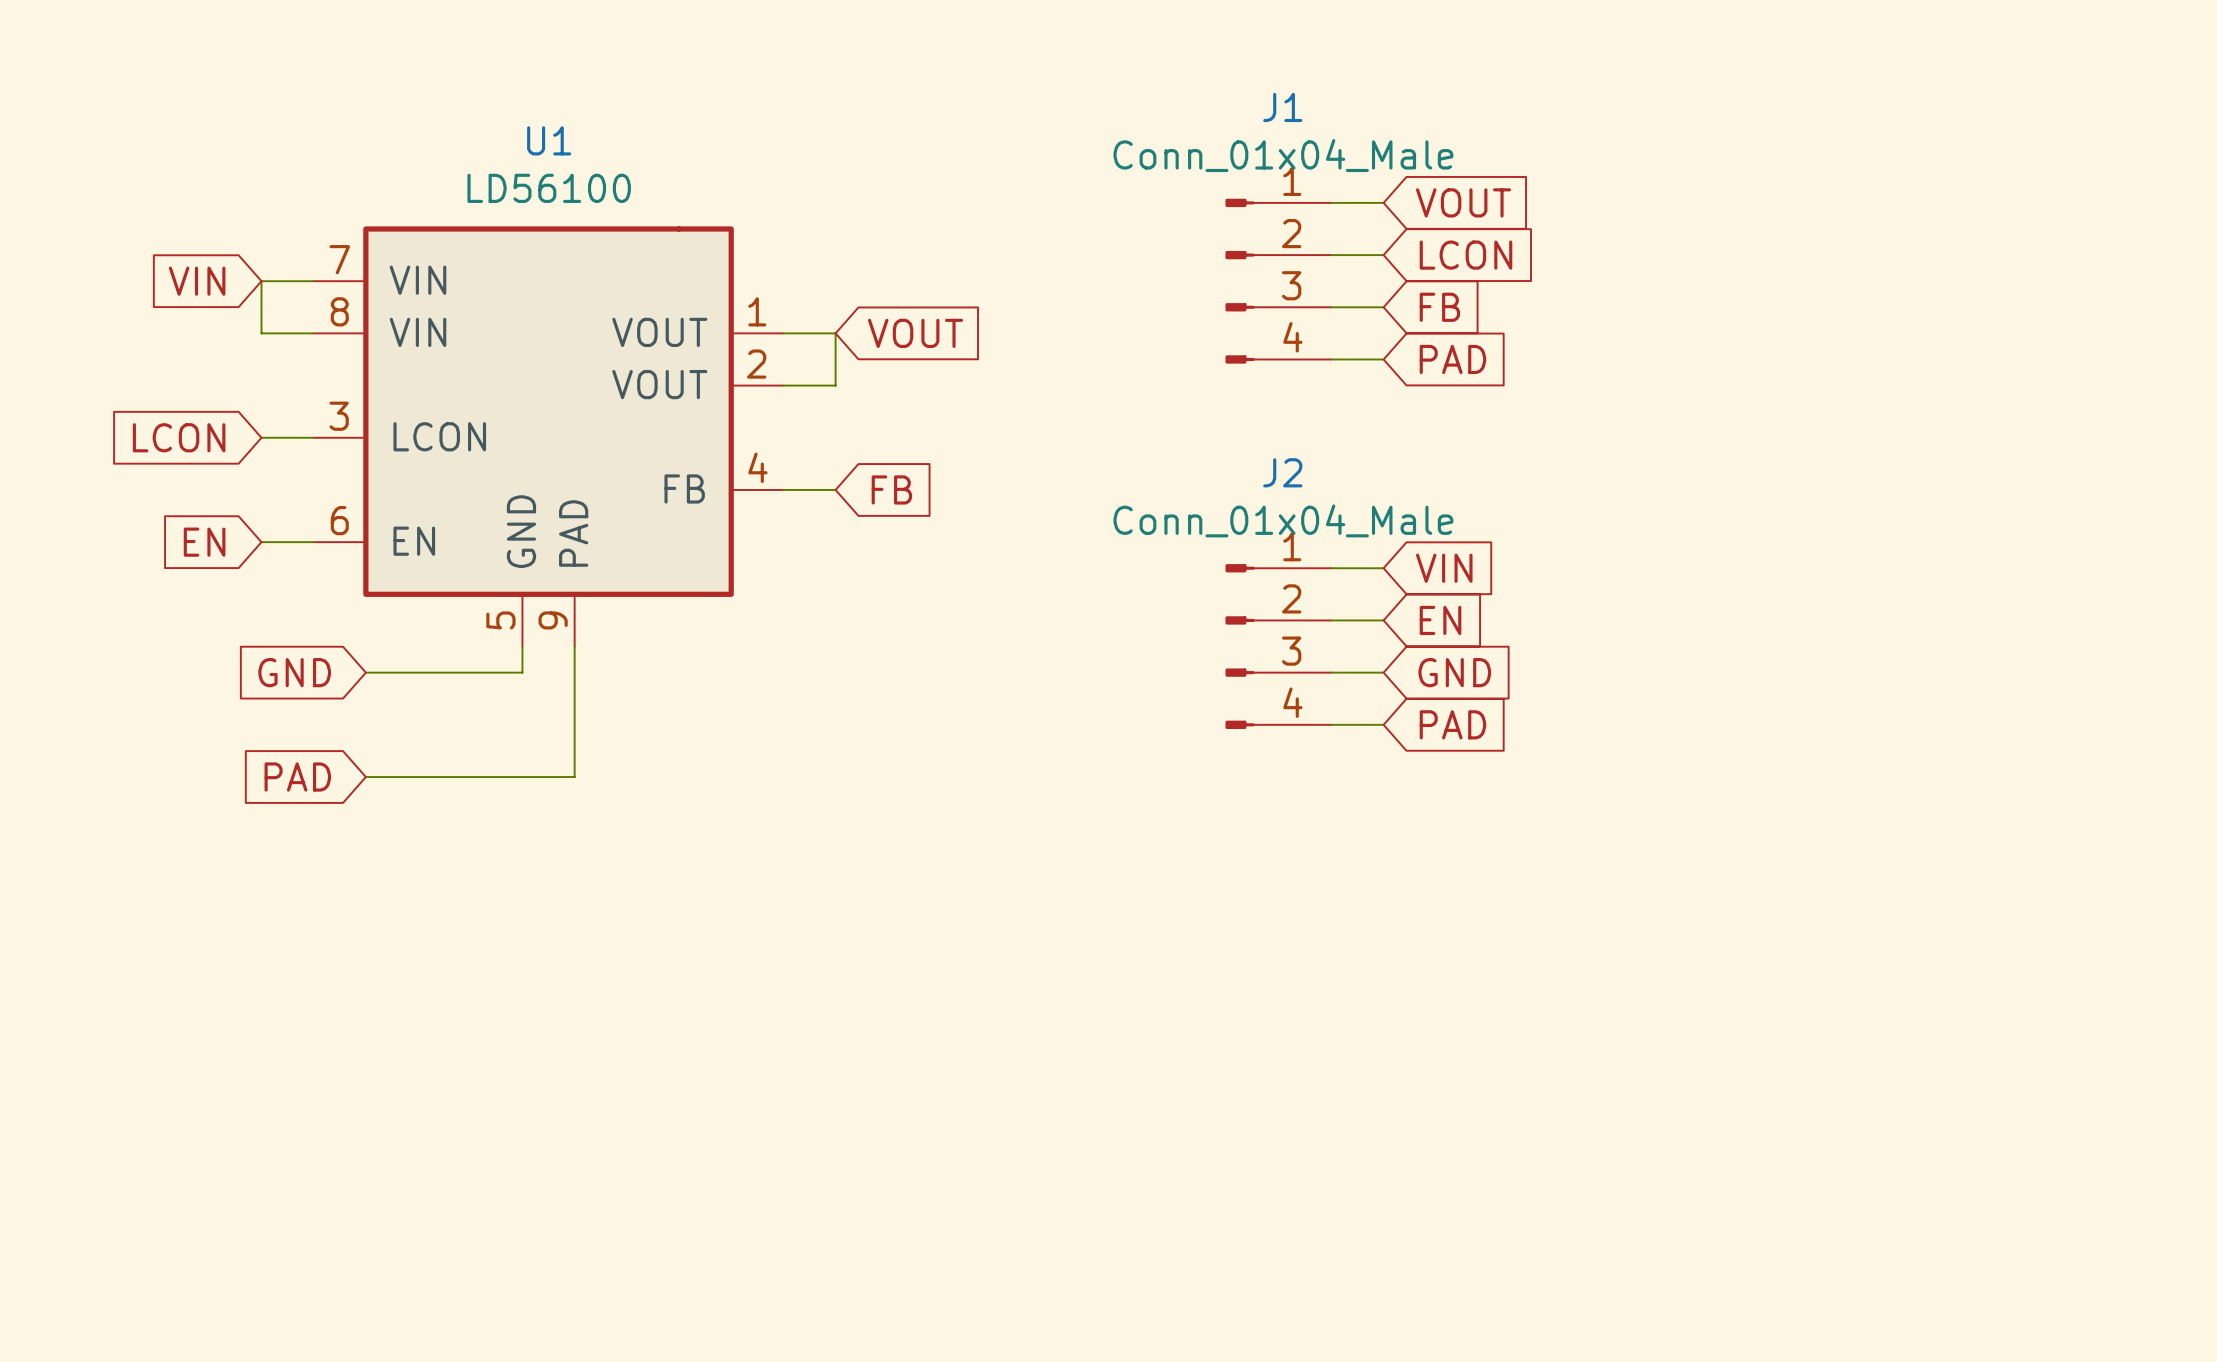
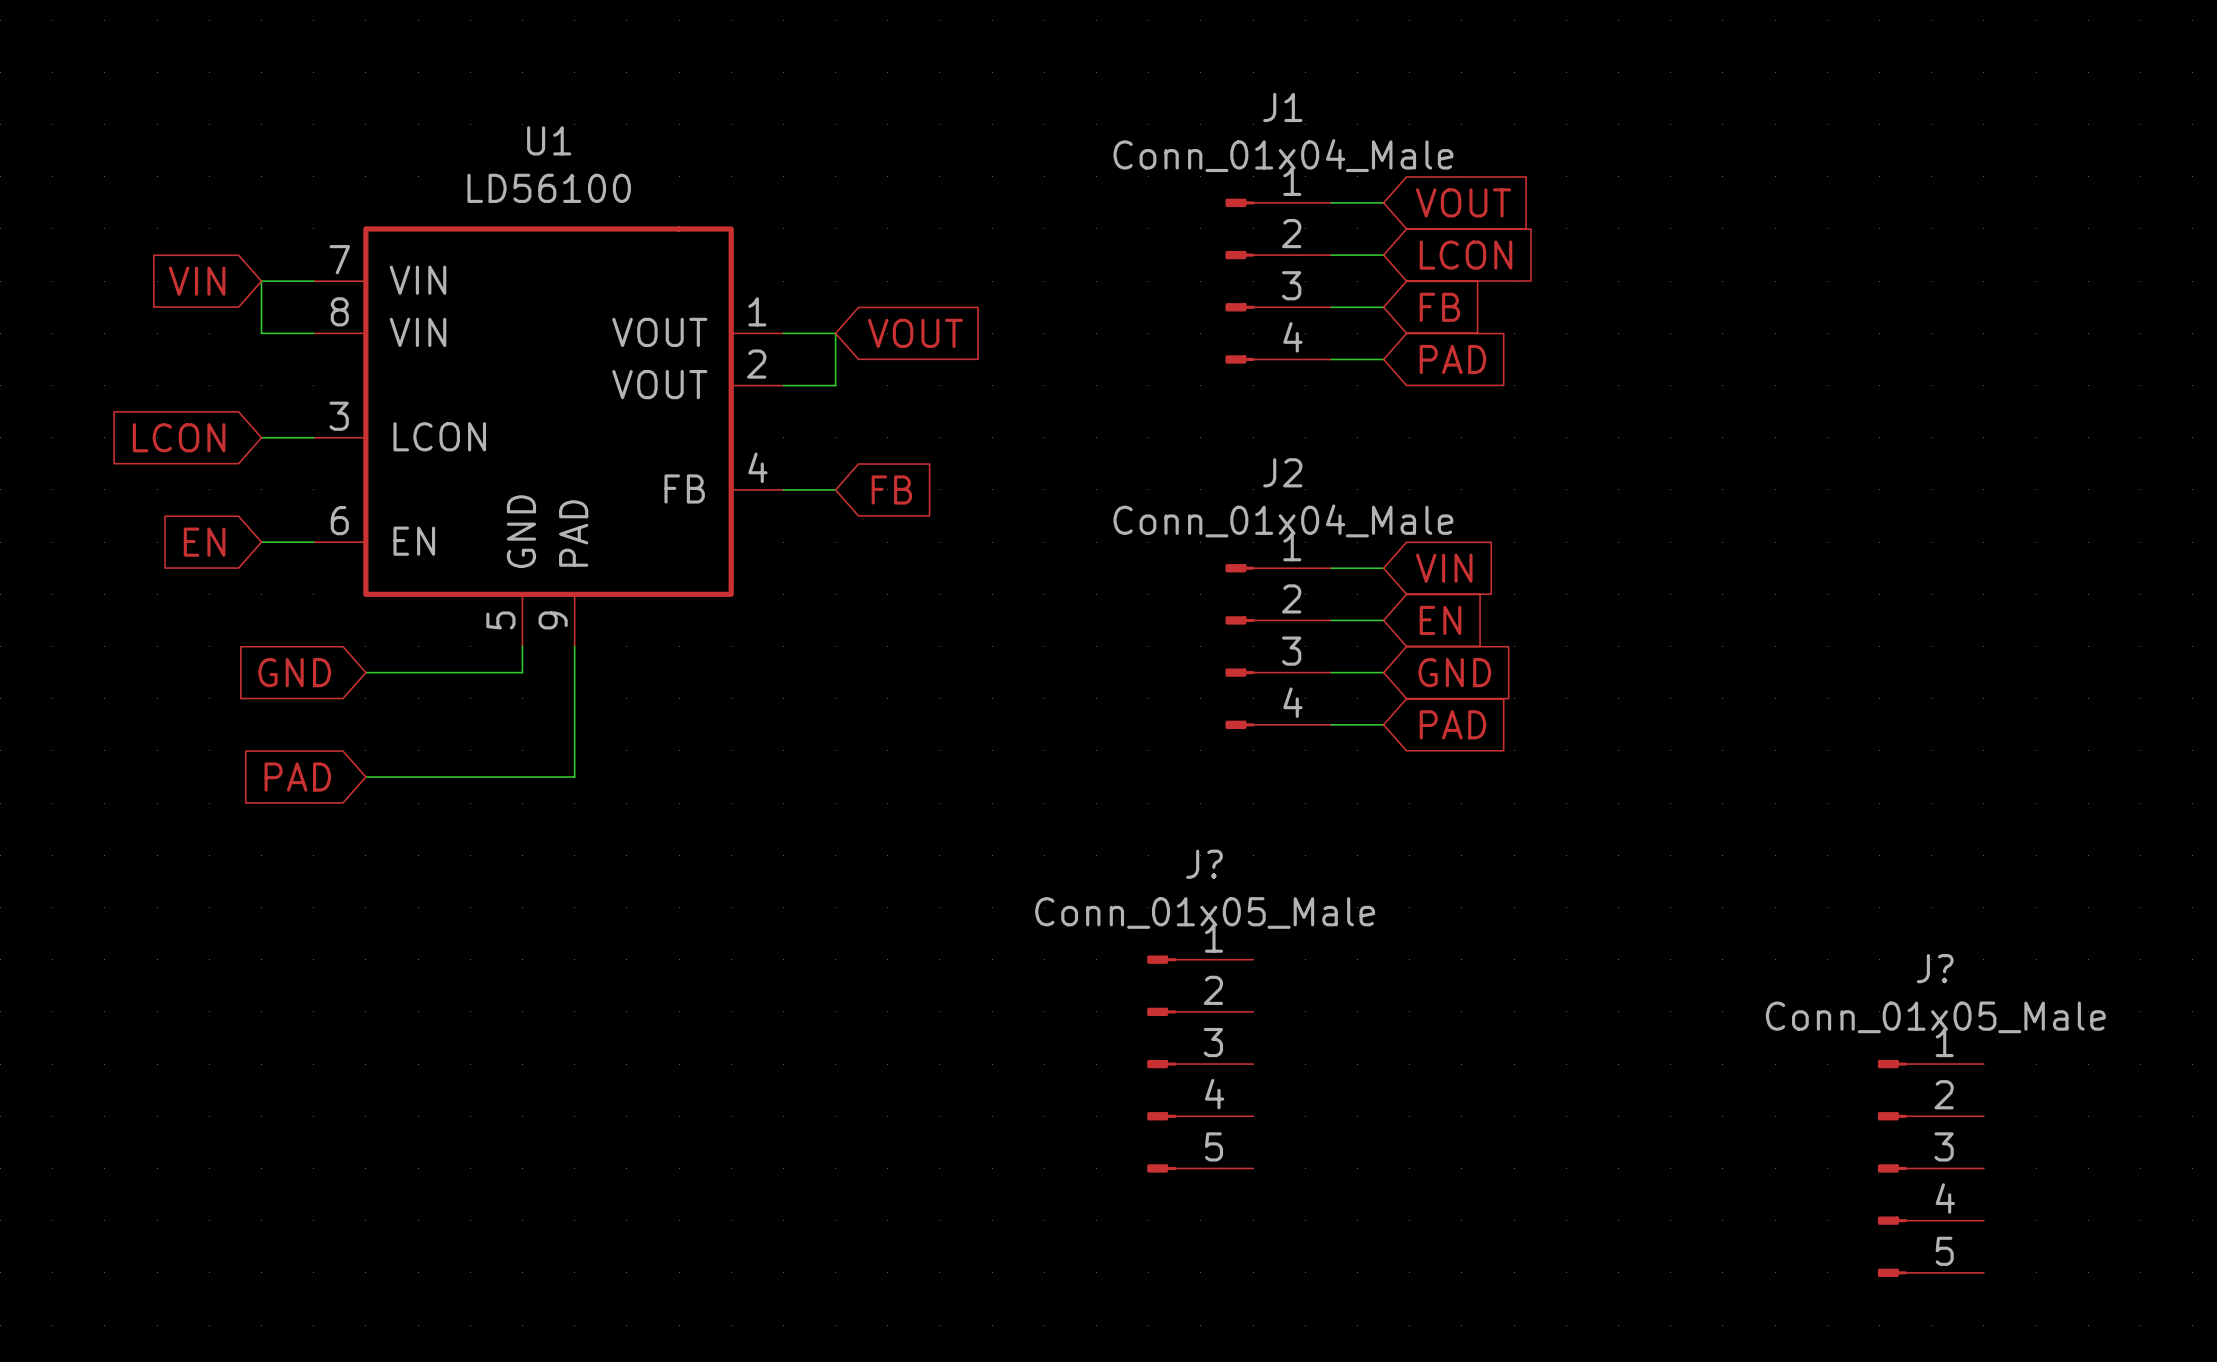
J?: none -> Conn_01x05_Male (1200, 1064)
J?: none -> Conn_01x05_Male (1930, 1168)

